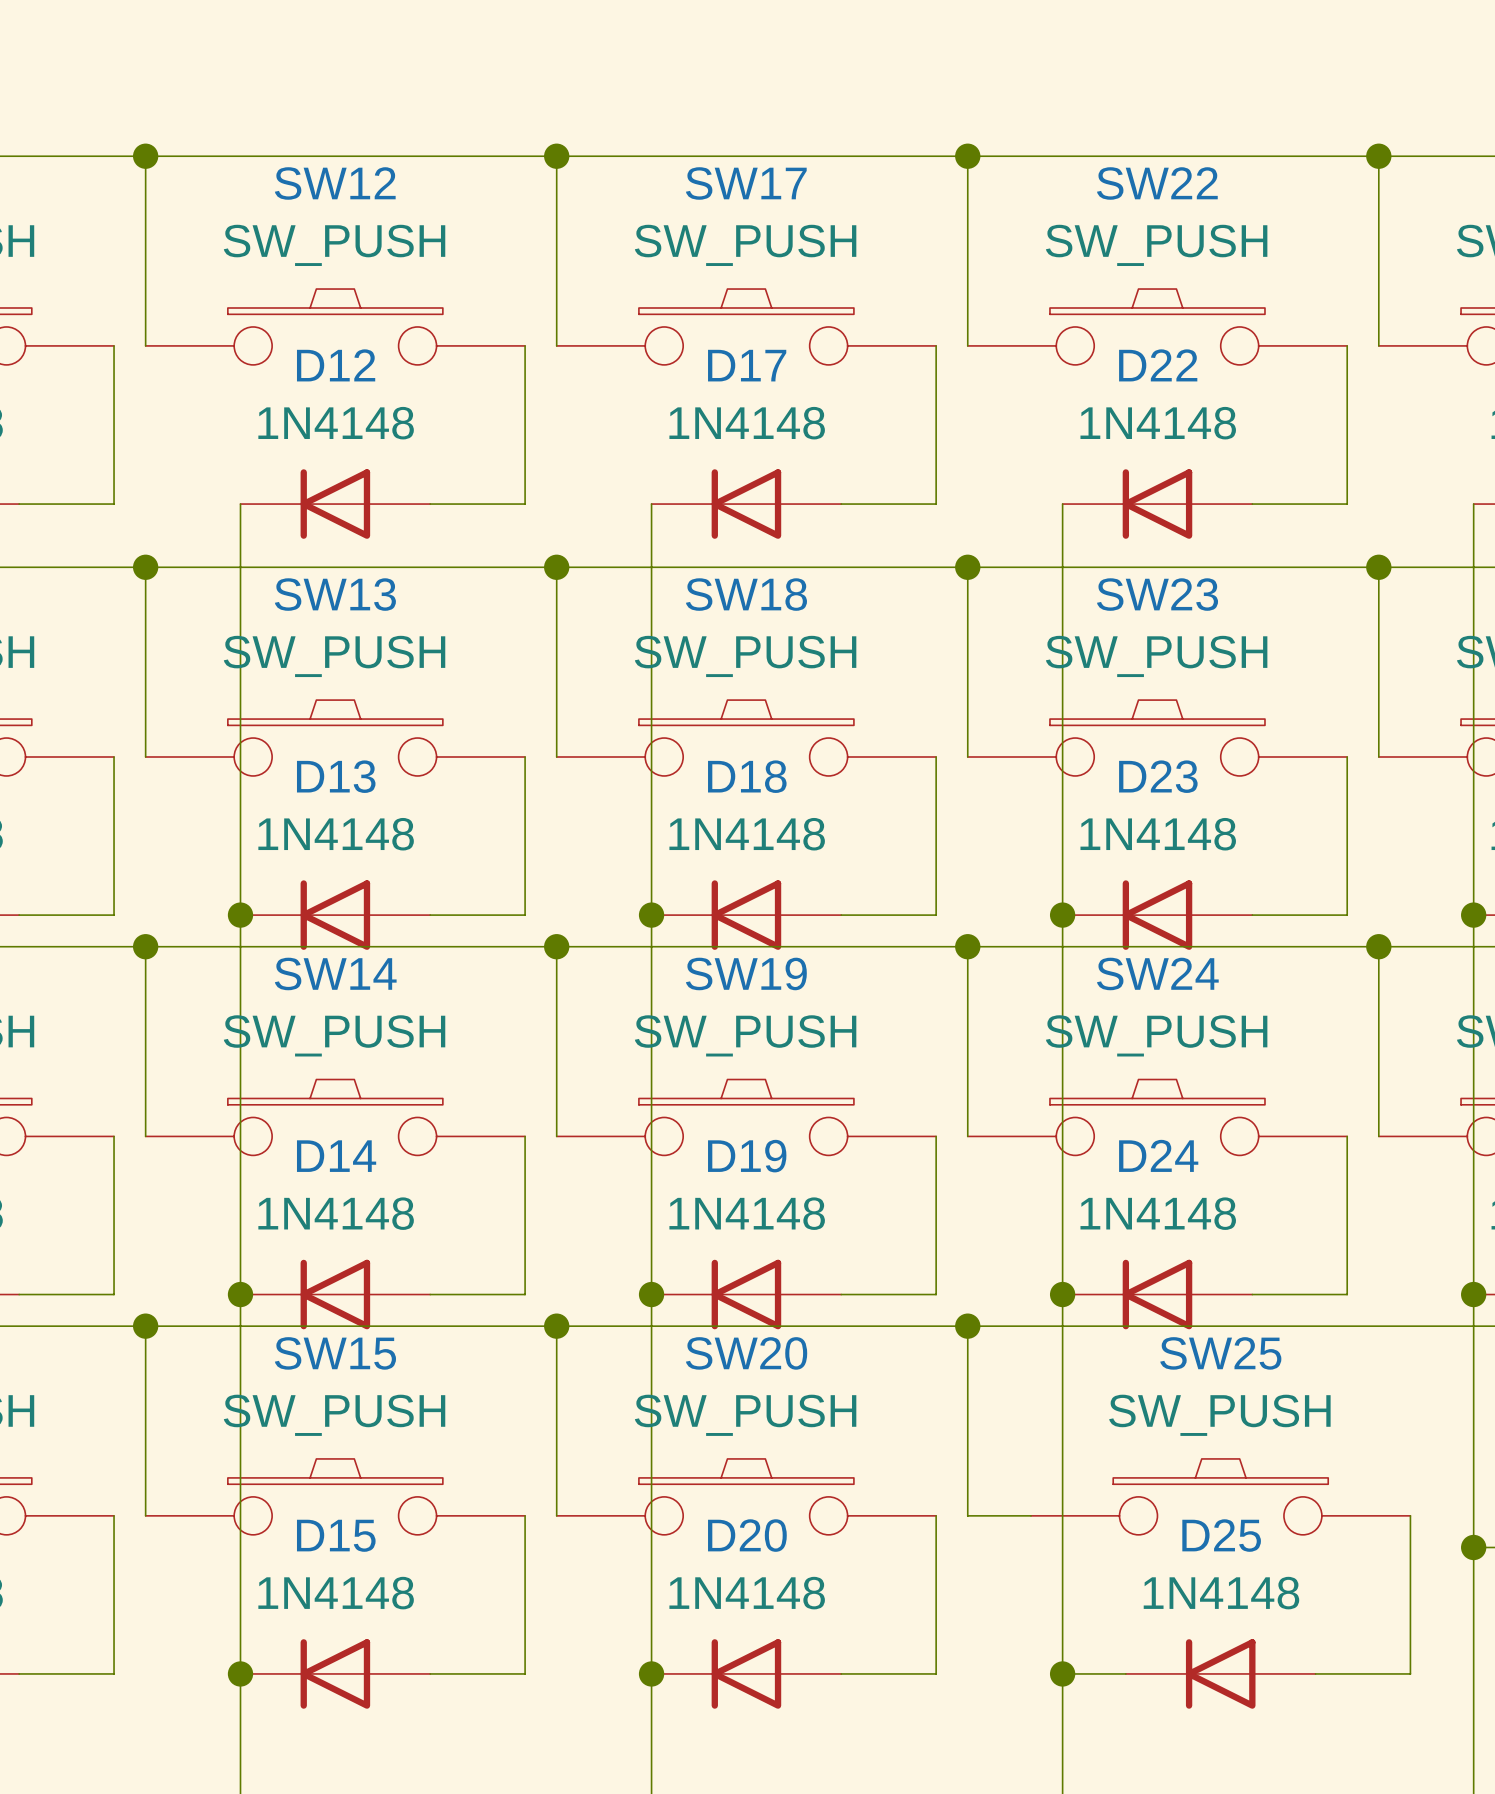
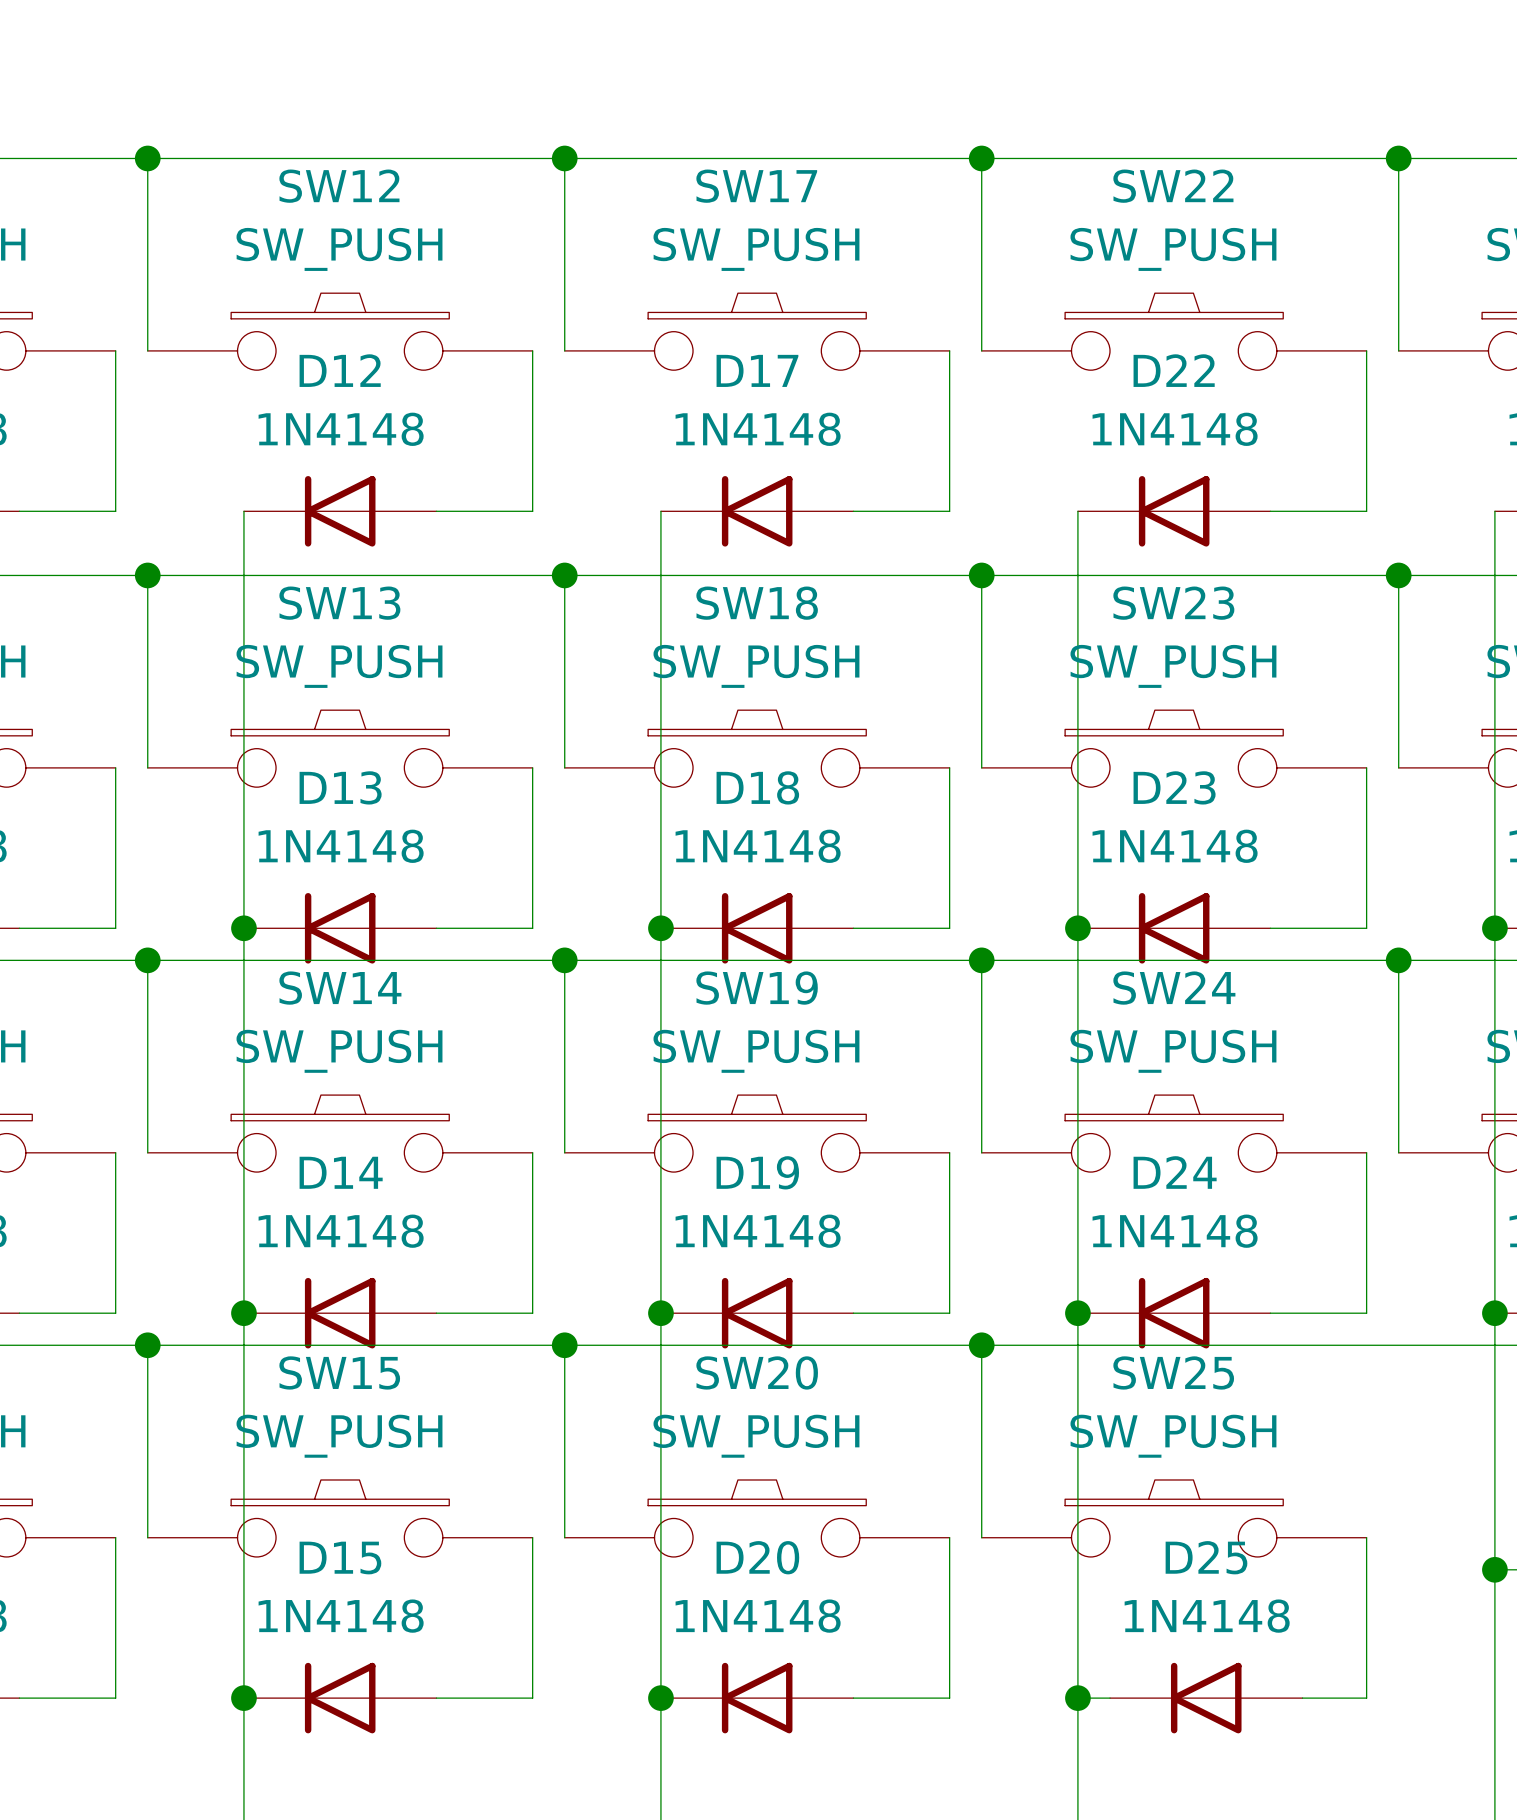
SW25 position: (1220, 1496) -> (1174, 1518)
wire: (1410, 1515) (1410, 1673) (1347, 1673) -> (1366, 1537) (1366, 1698)
D25 position: (1220, 1673) -> (1206, 1698)

